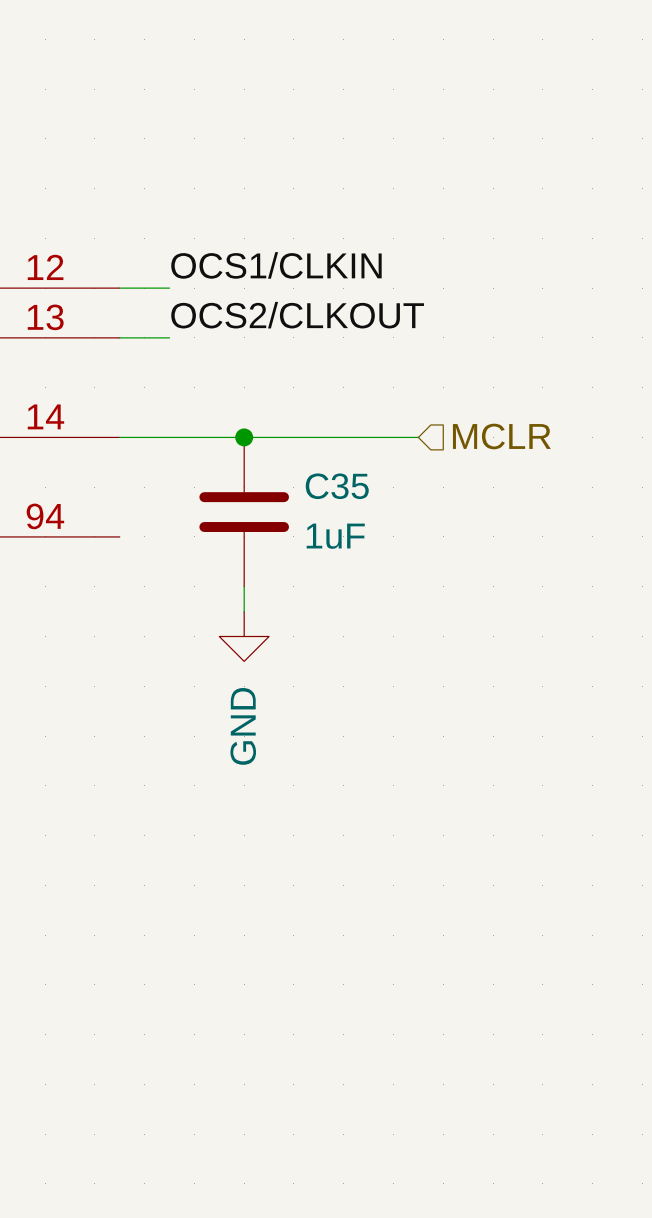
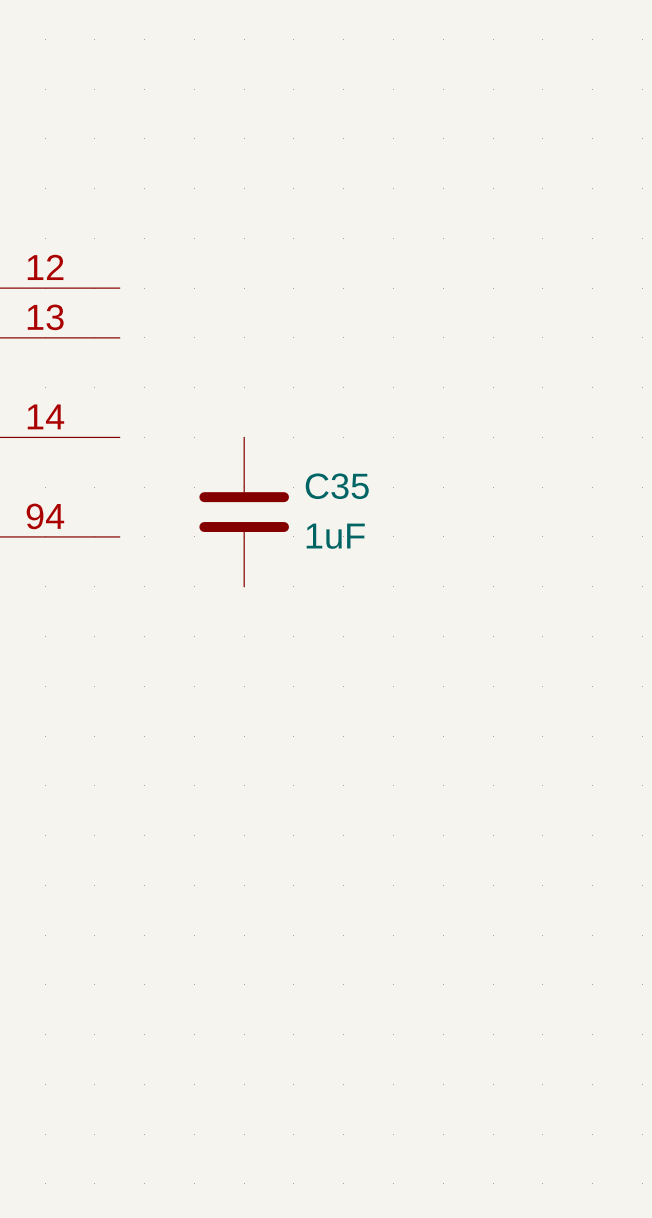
label: OCS1/CLKIN (276, 265) -> none
wire: (119, 288) (169, 288) -> none
label: OCS2/CLKOUT (297, 315) -> none
wire: (119, 337) (169, 337) -> none
hierarchical label: MCLR (501, 436) -> none
wire: (119, 437) (418, 437) -> none
junction: (244, 437) -> none
wire: (244, 586) (244, 611) -> none
power symbol: GND (244, 636) -> none

